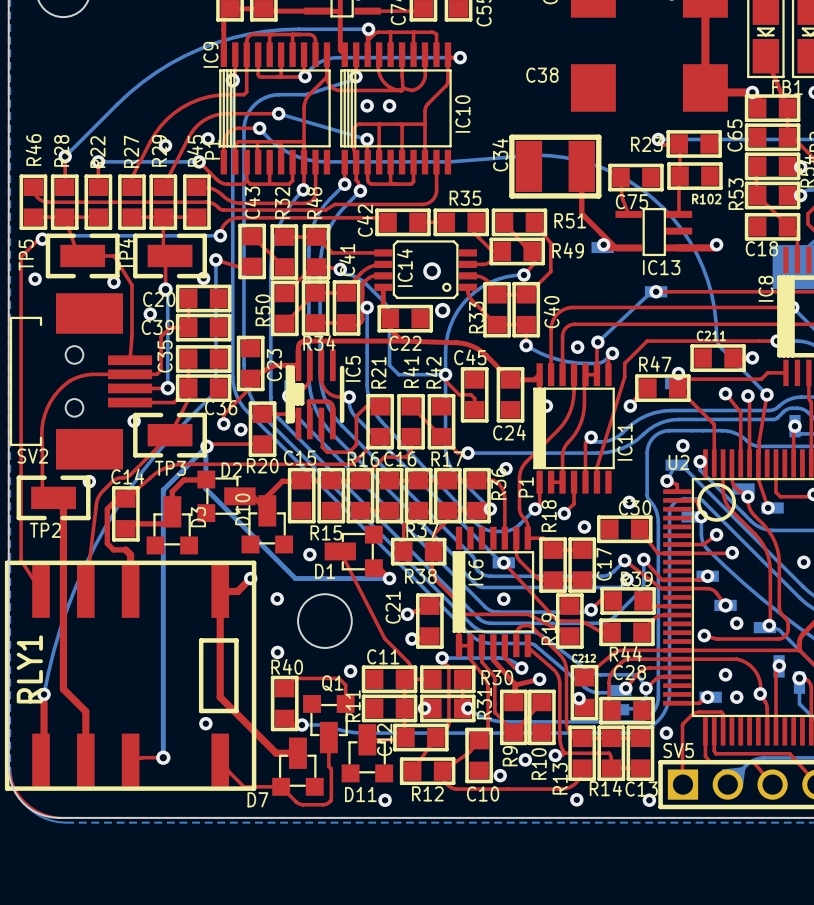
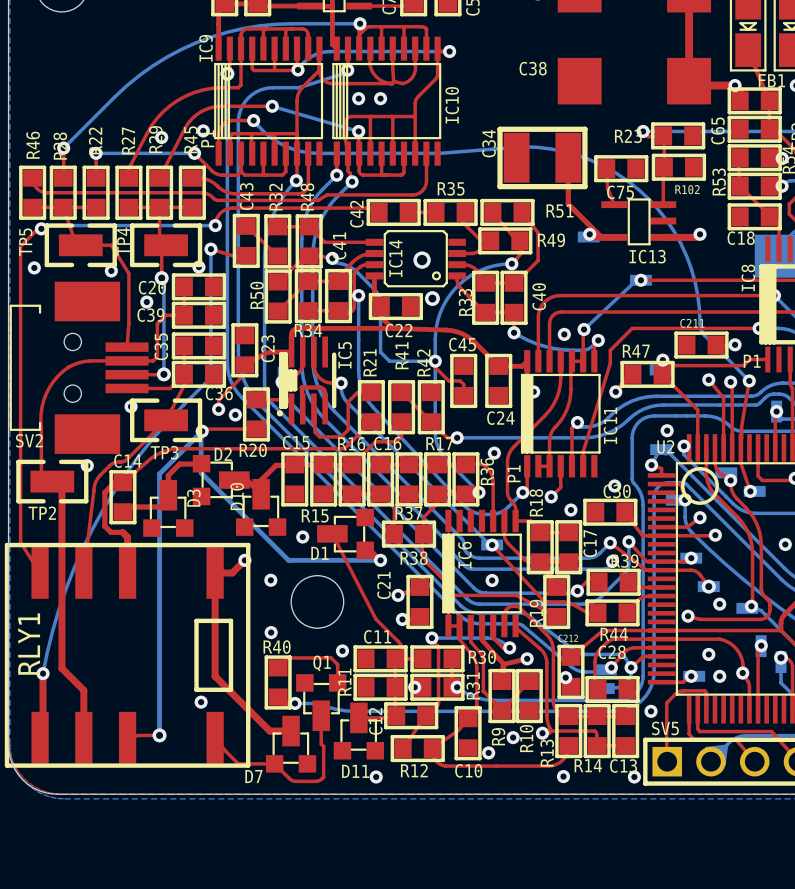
text: none -> P1 (752, 361)
drawing: none -> [276, 410, 284, 417]

